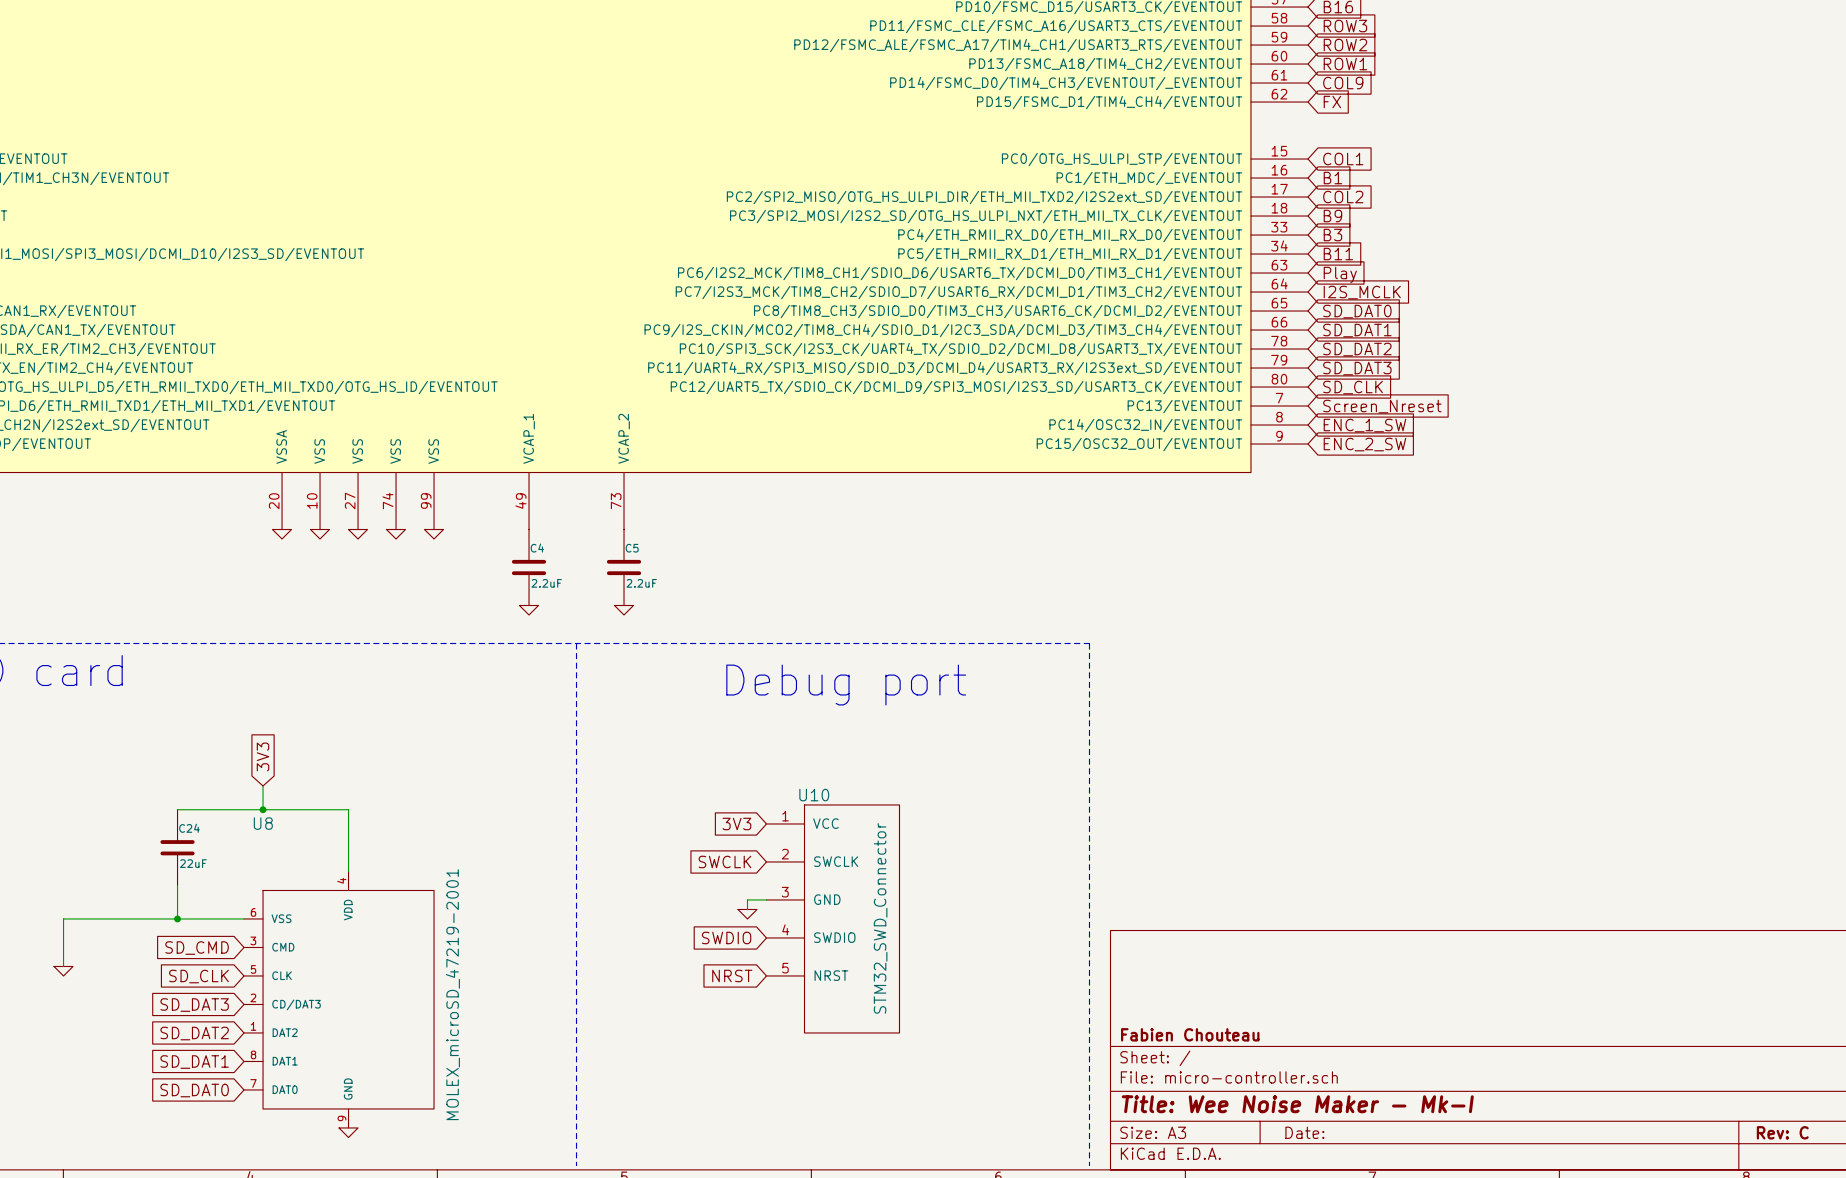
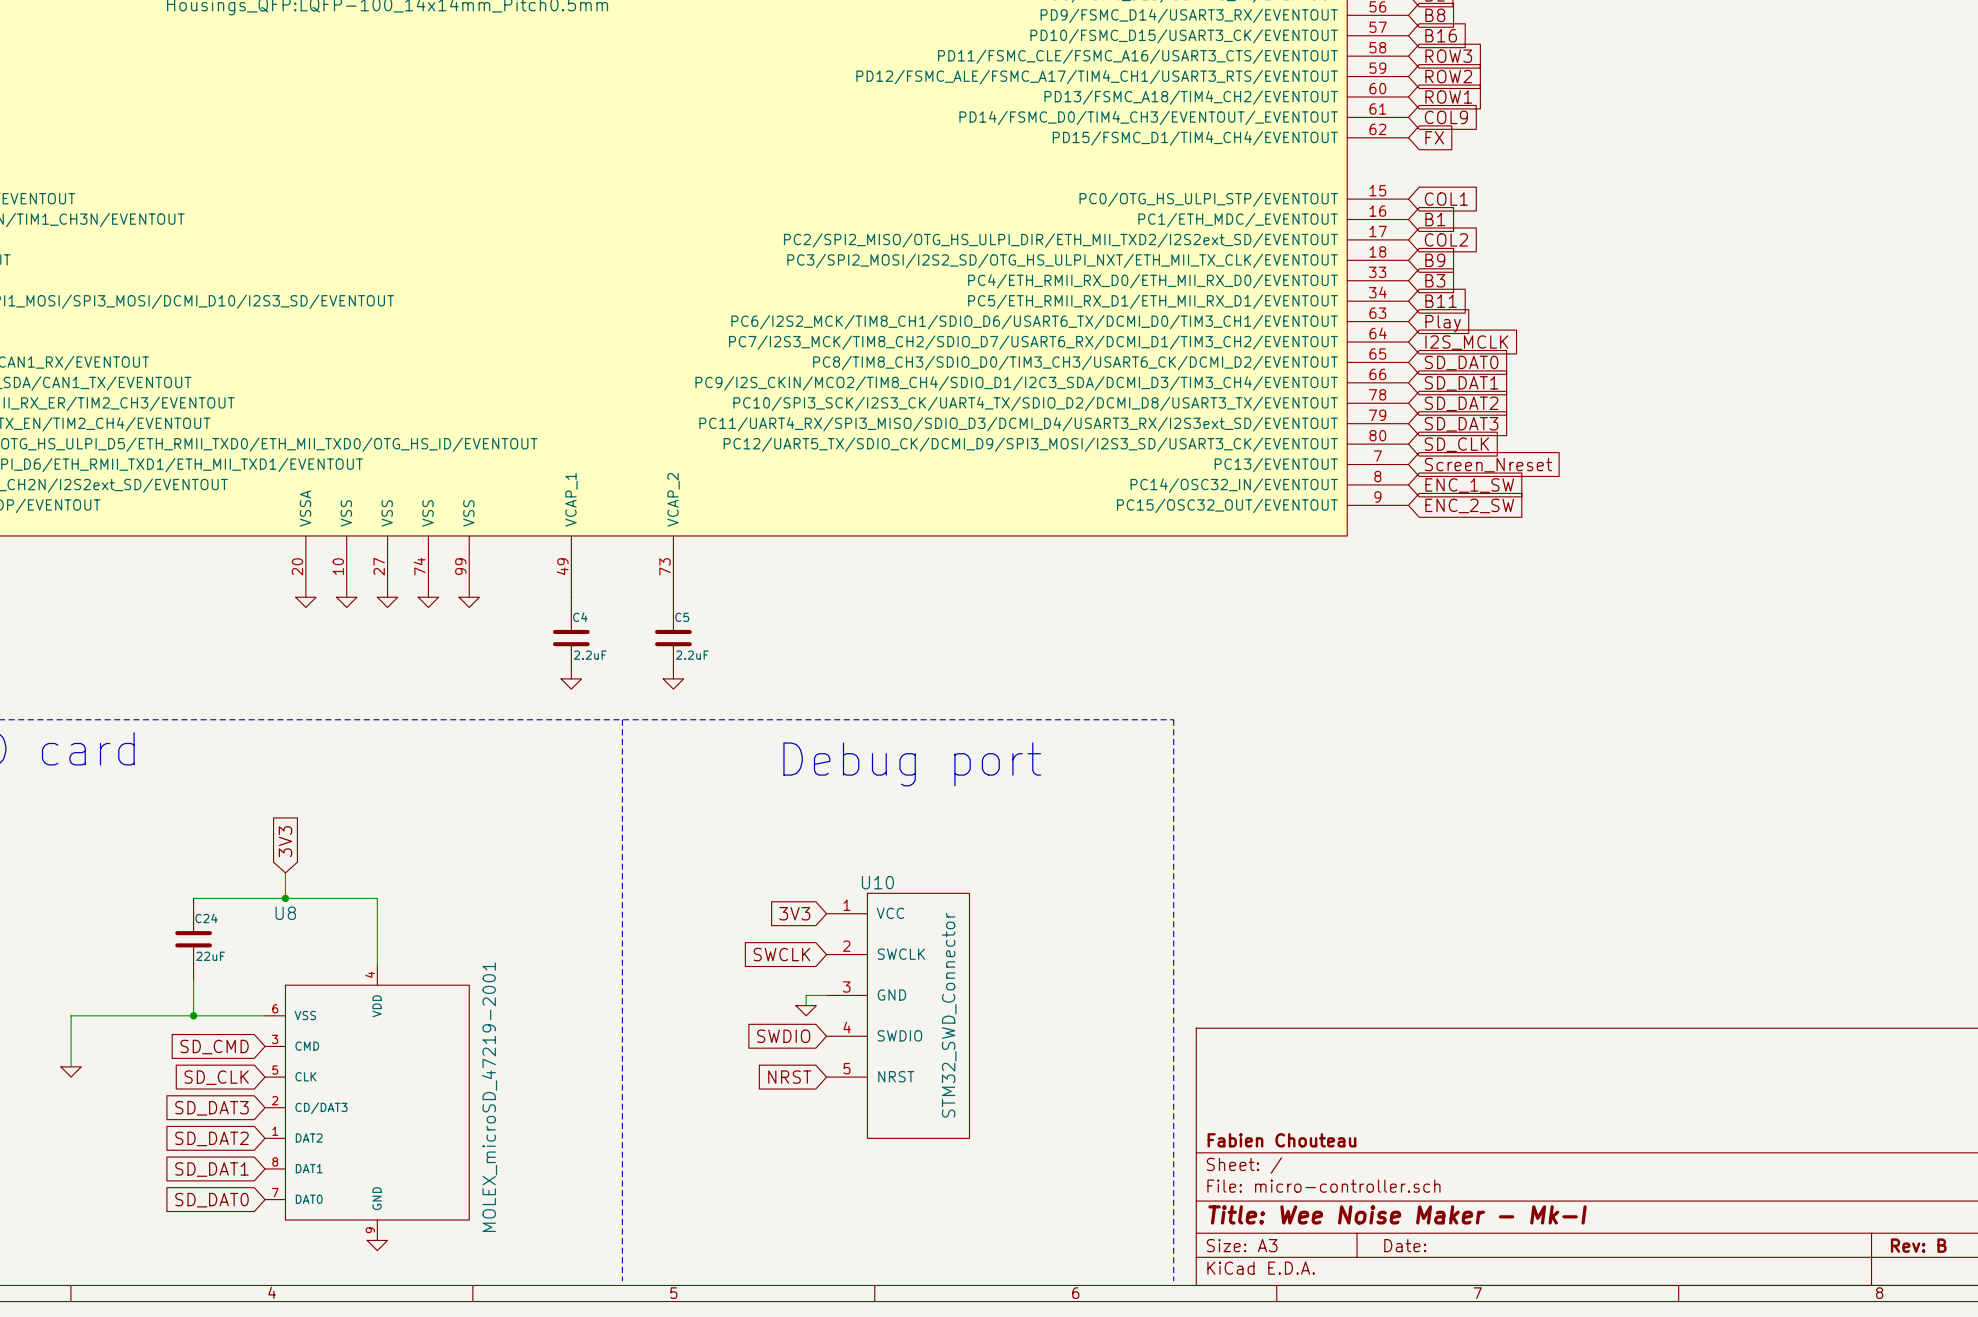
title block: Rev: C (1782, 1132) -> Rev: B (1918, 1245)

